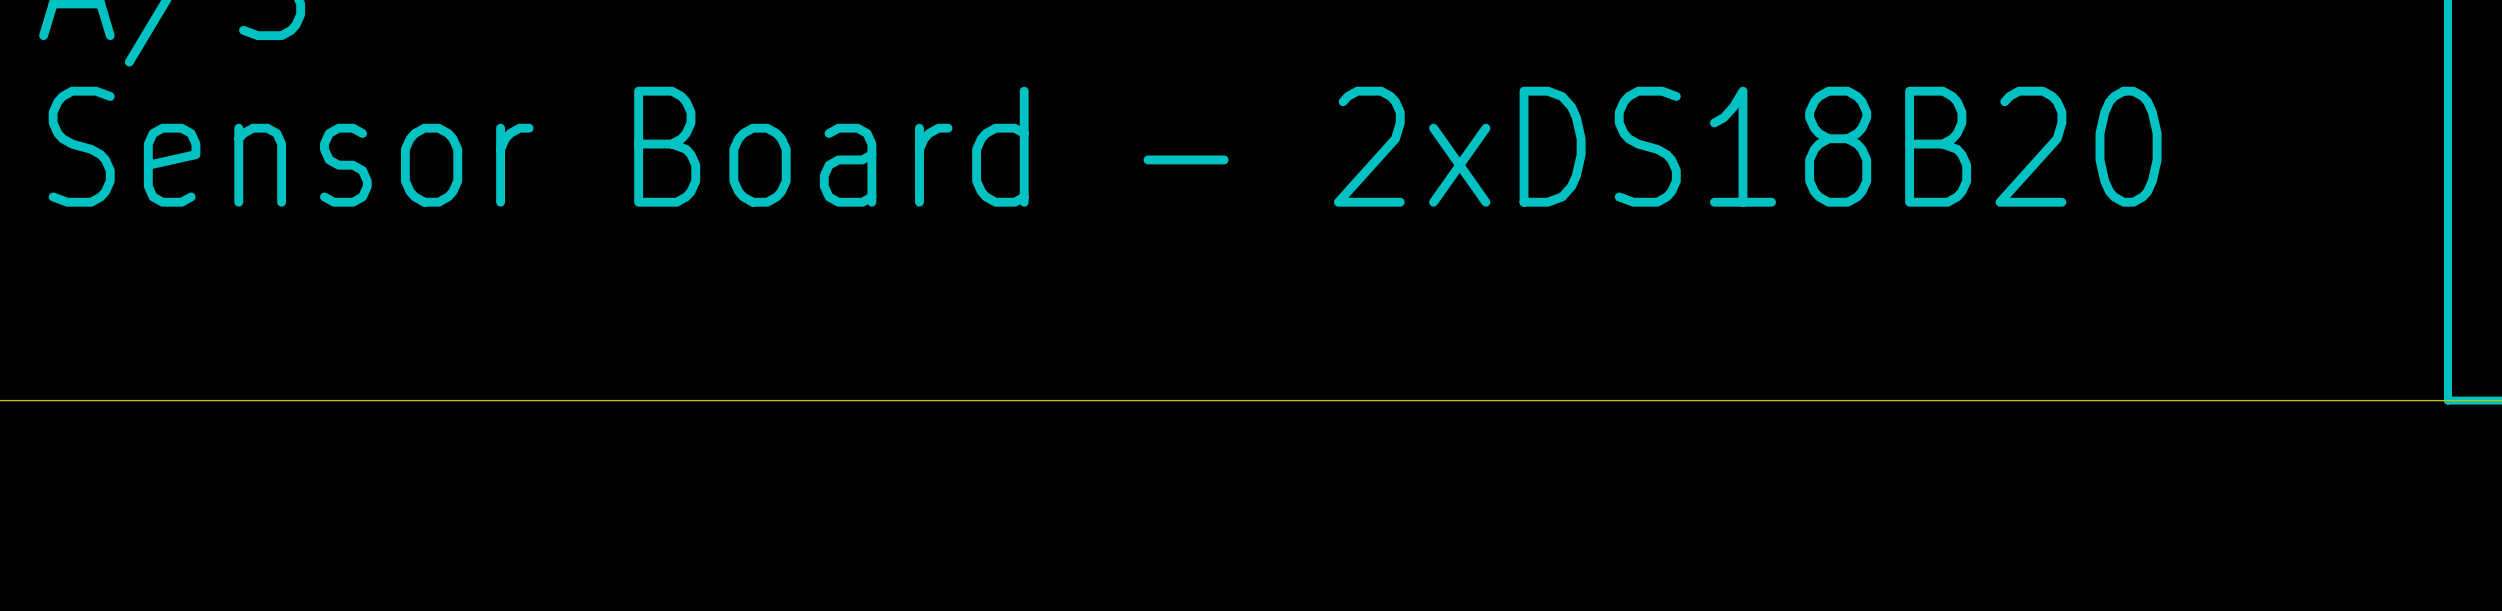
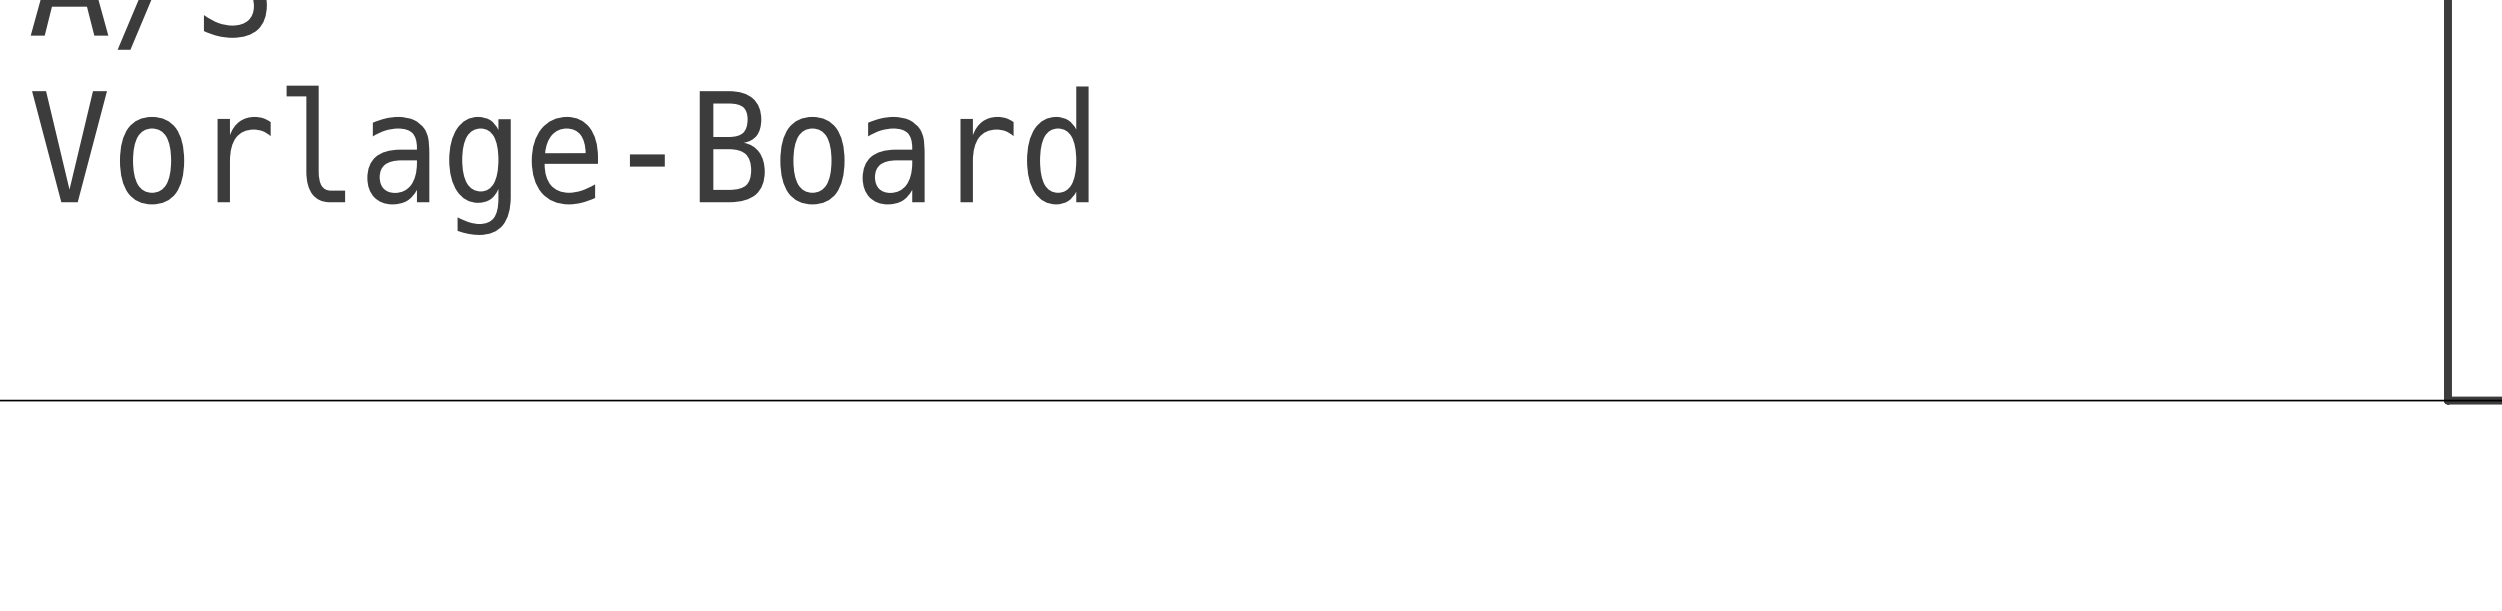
text: Sensor Board - 2xDS18B20 (1105, 146) -> Vorlage-Board (560, 160)

